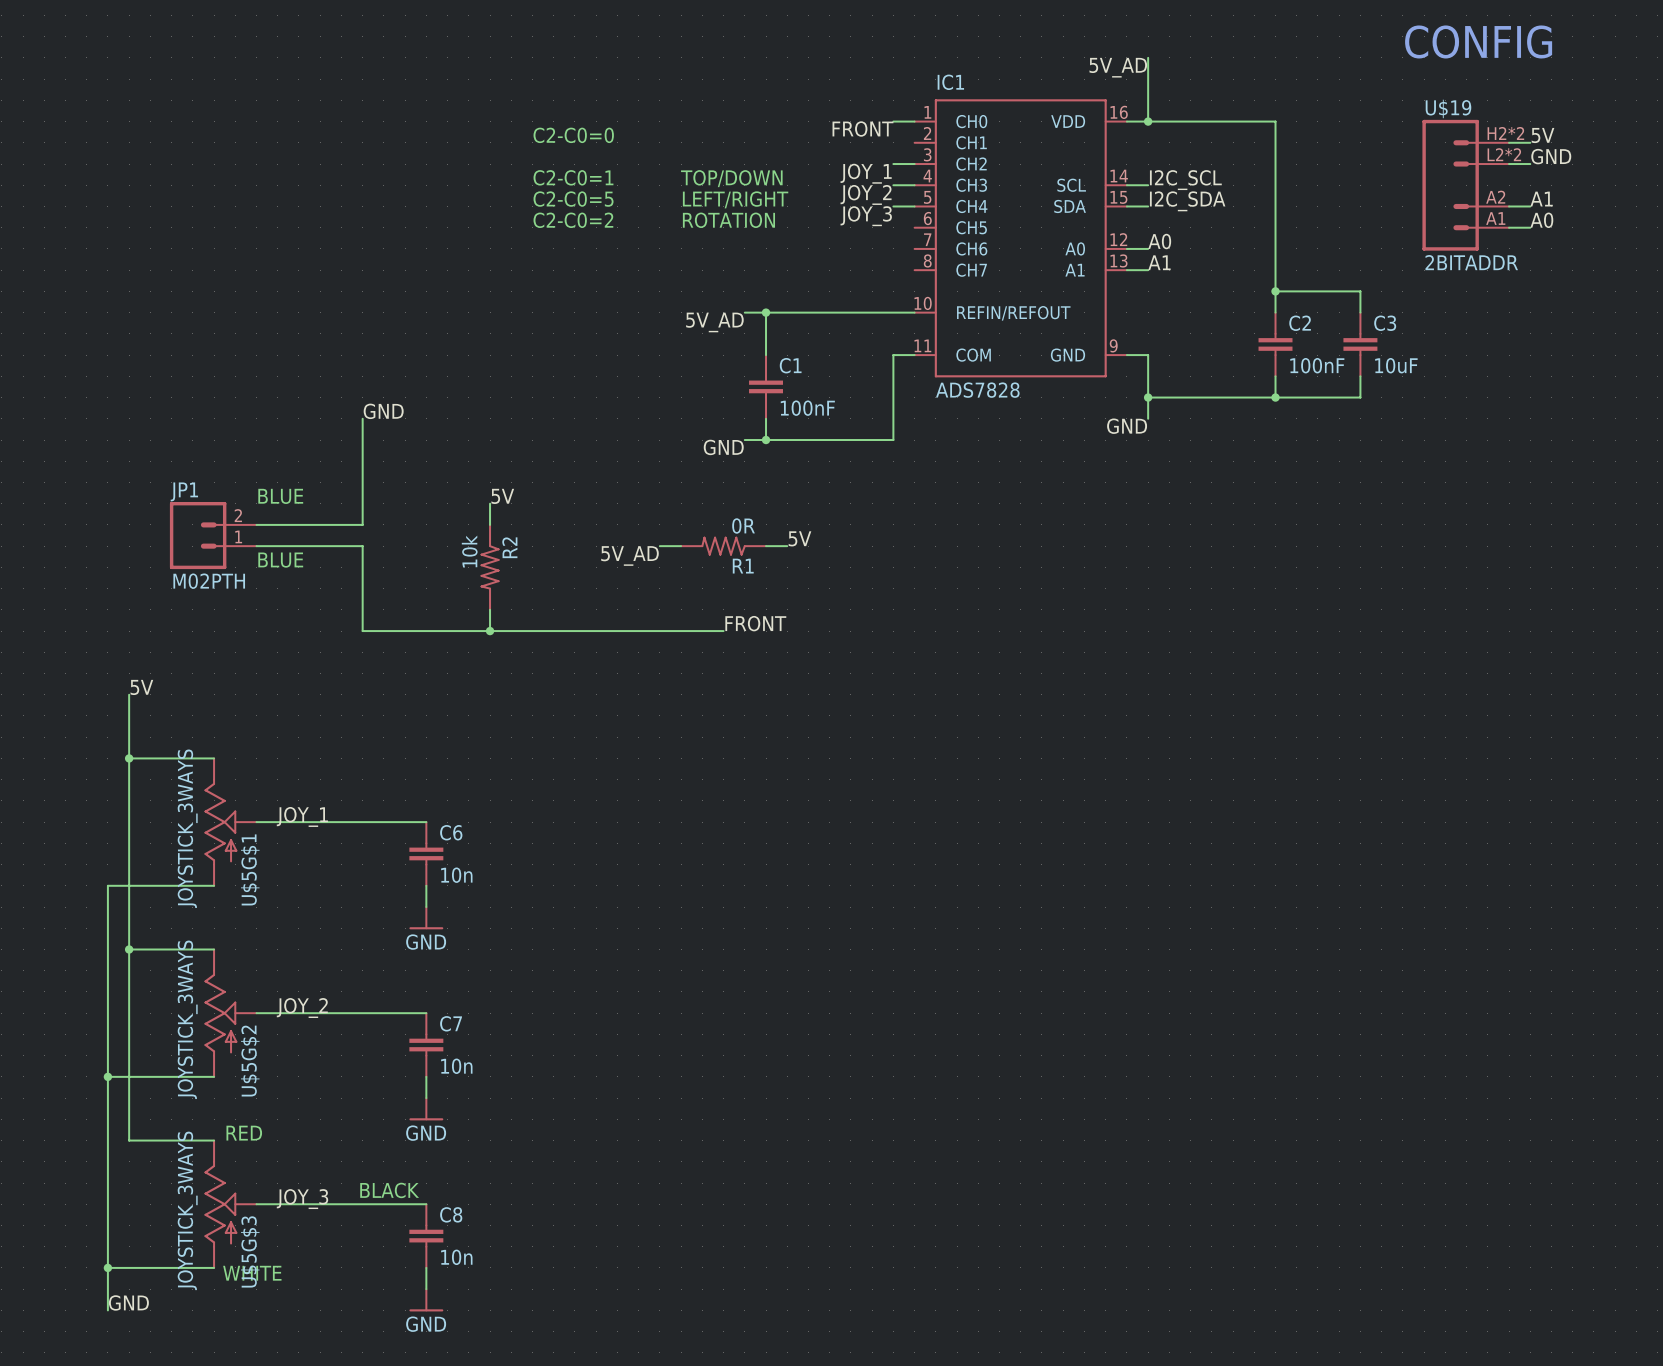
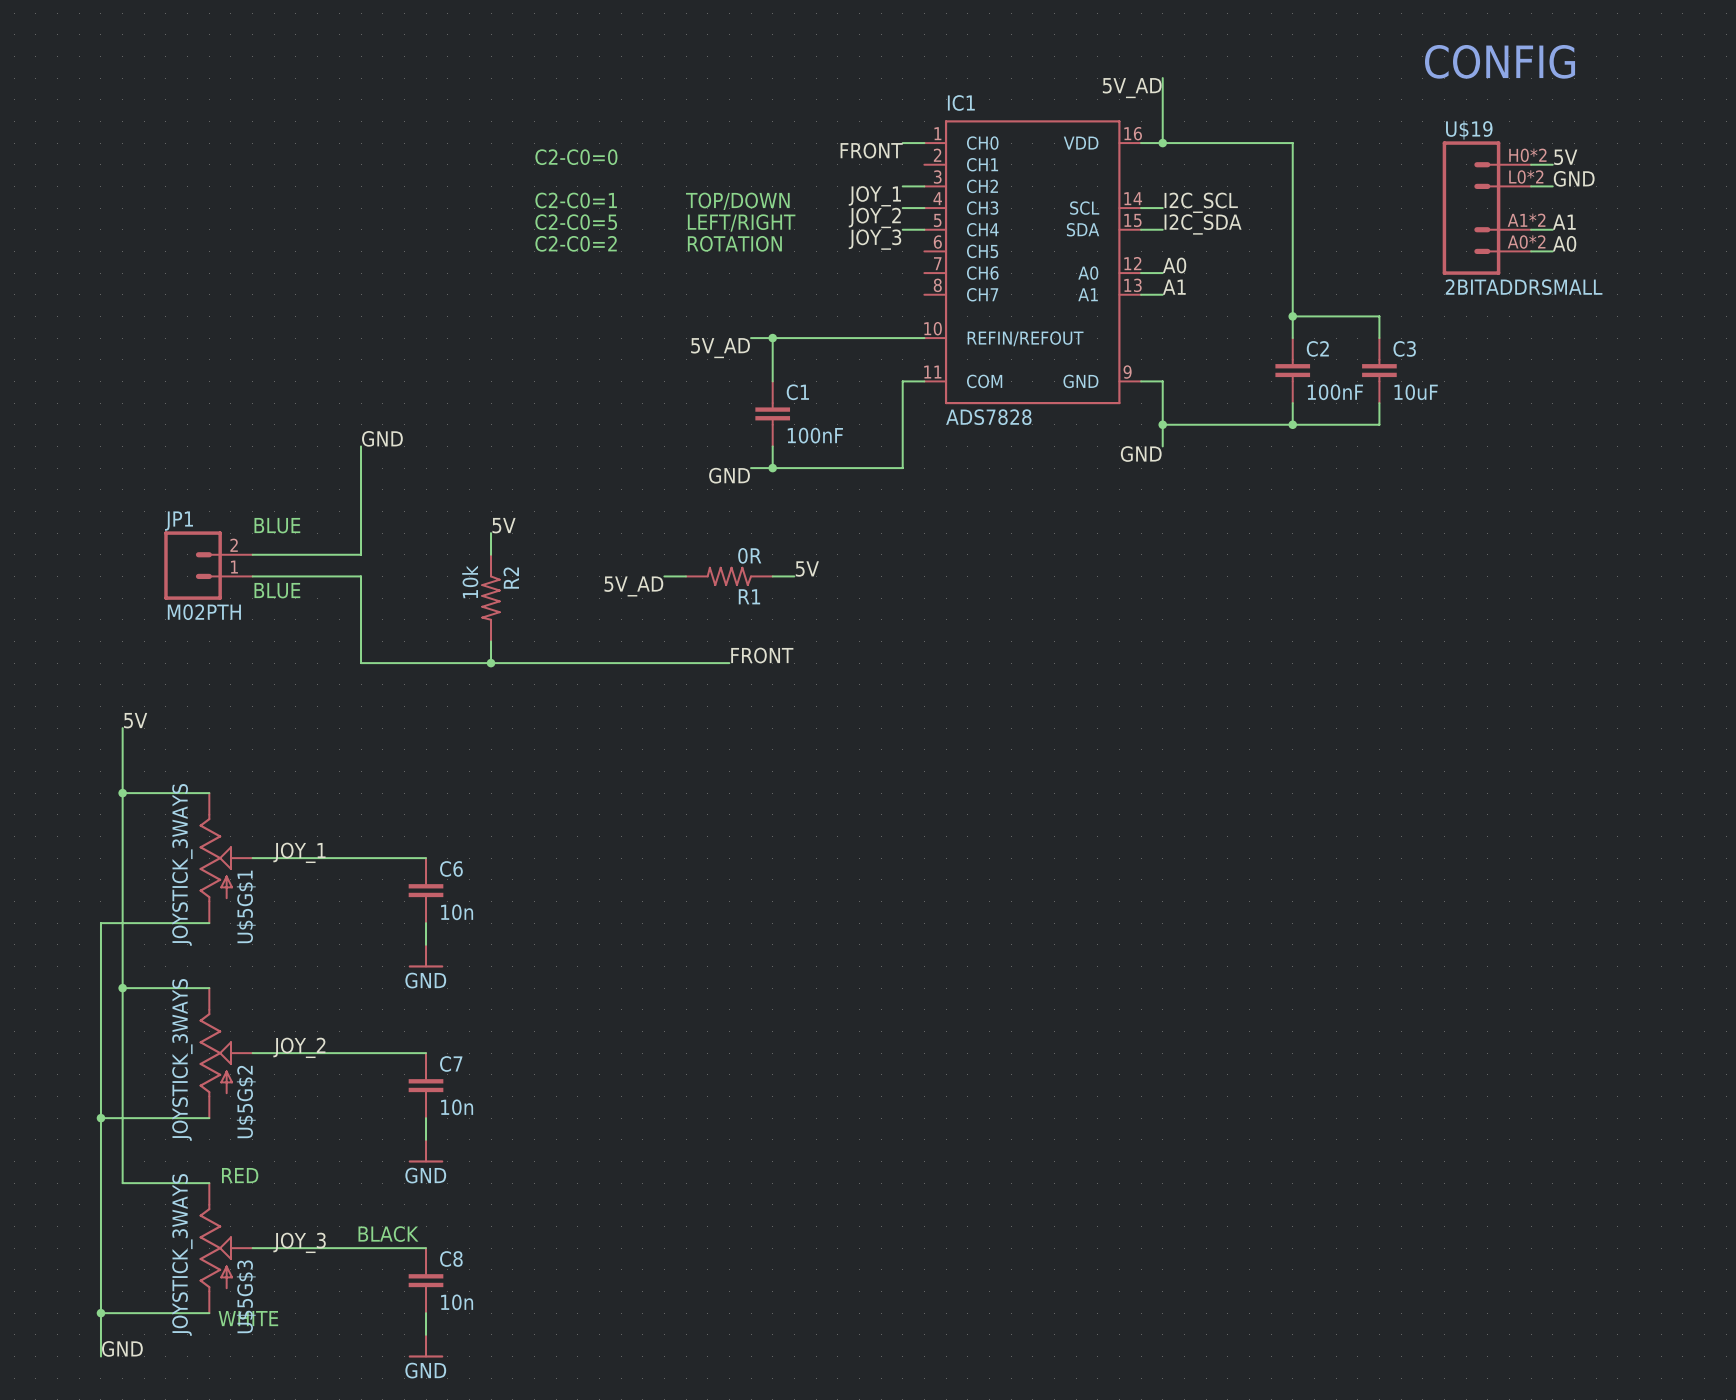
U$19 pin number: H2*2 (1505, 133) -> H0*2 (1527, 155)
U$19 pin number: L2*2 (1504, 154) -> L0*2 (1526, 177)
U$19 pin number: A2 (1495, 197) -> A1*2 (1526, 220)
U$19 pin number: A1 (1495, 218) -> A0*2 (1526, 242)
U$19 value: 2BITADDR (1471, 262) -> 2BITADDRSMALL (1524, 287)

